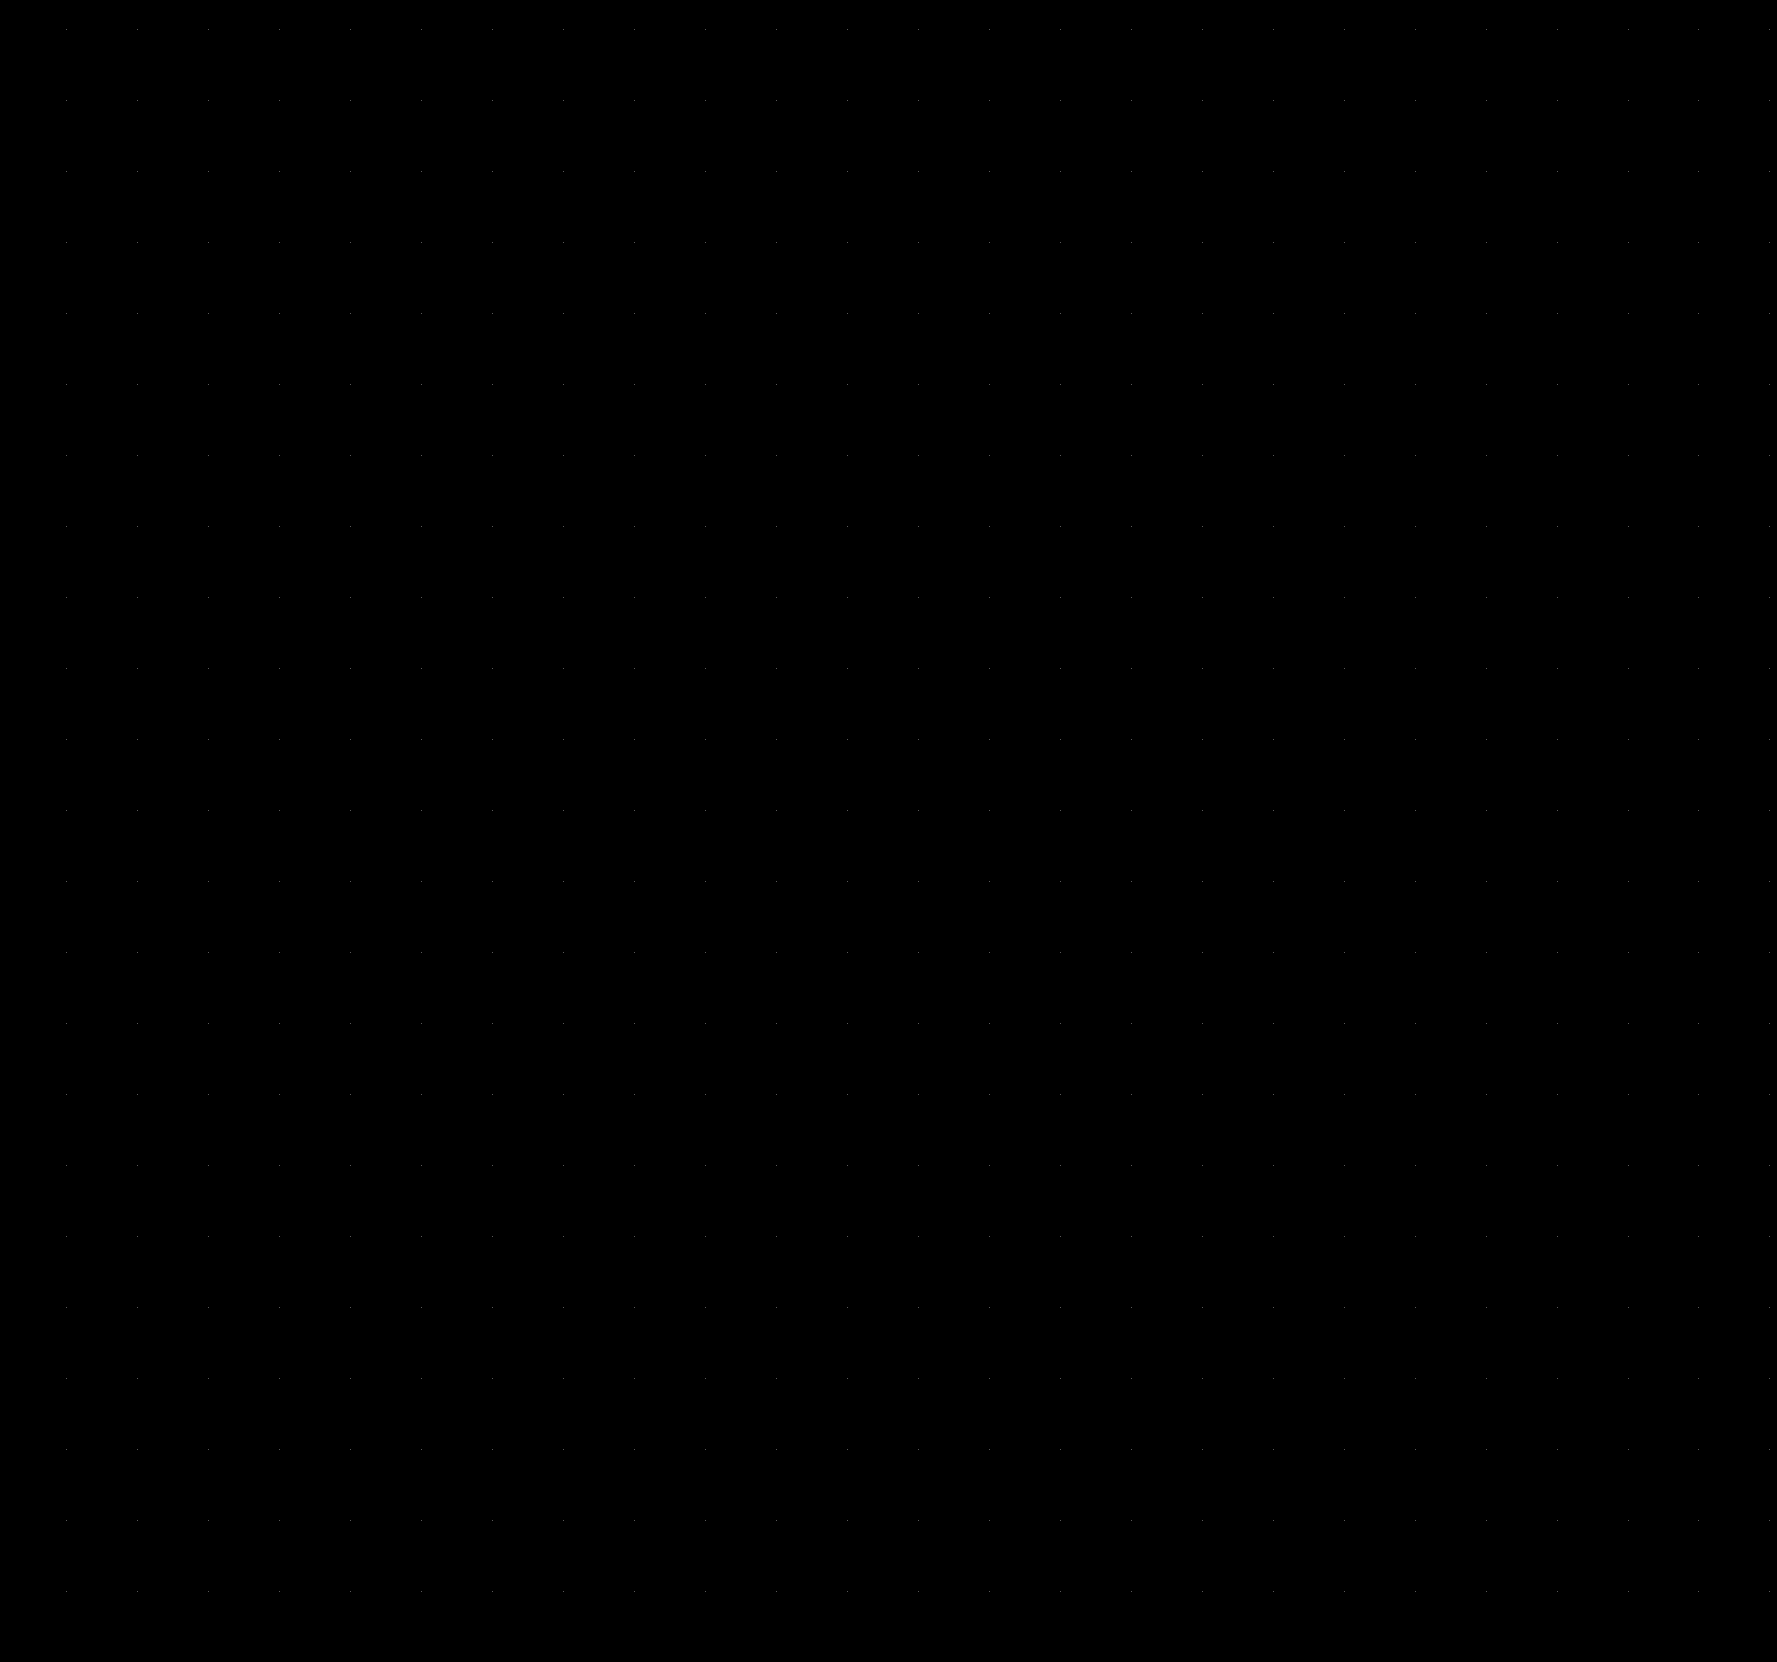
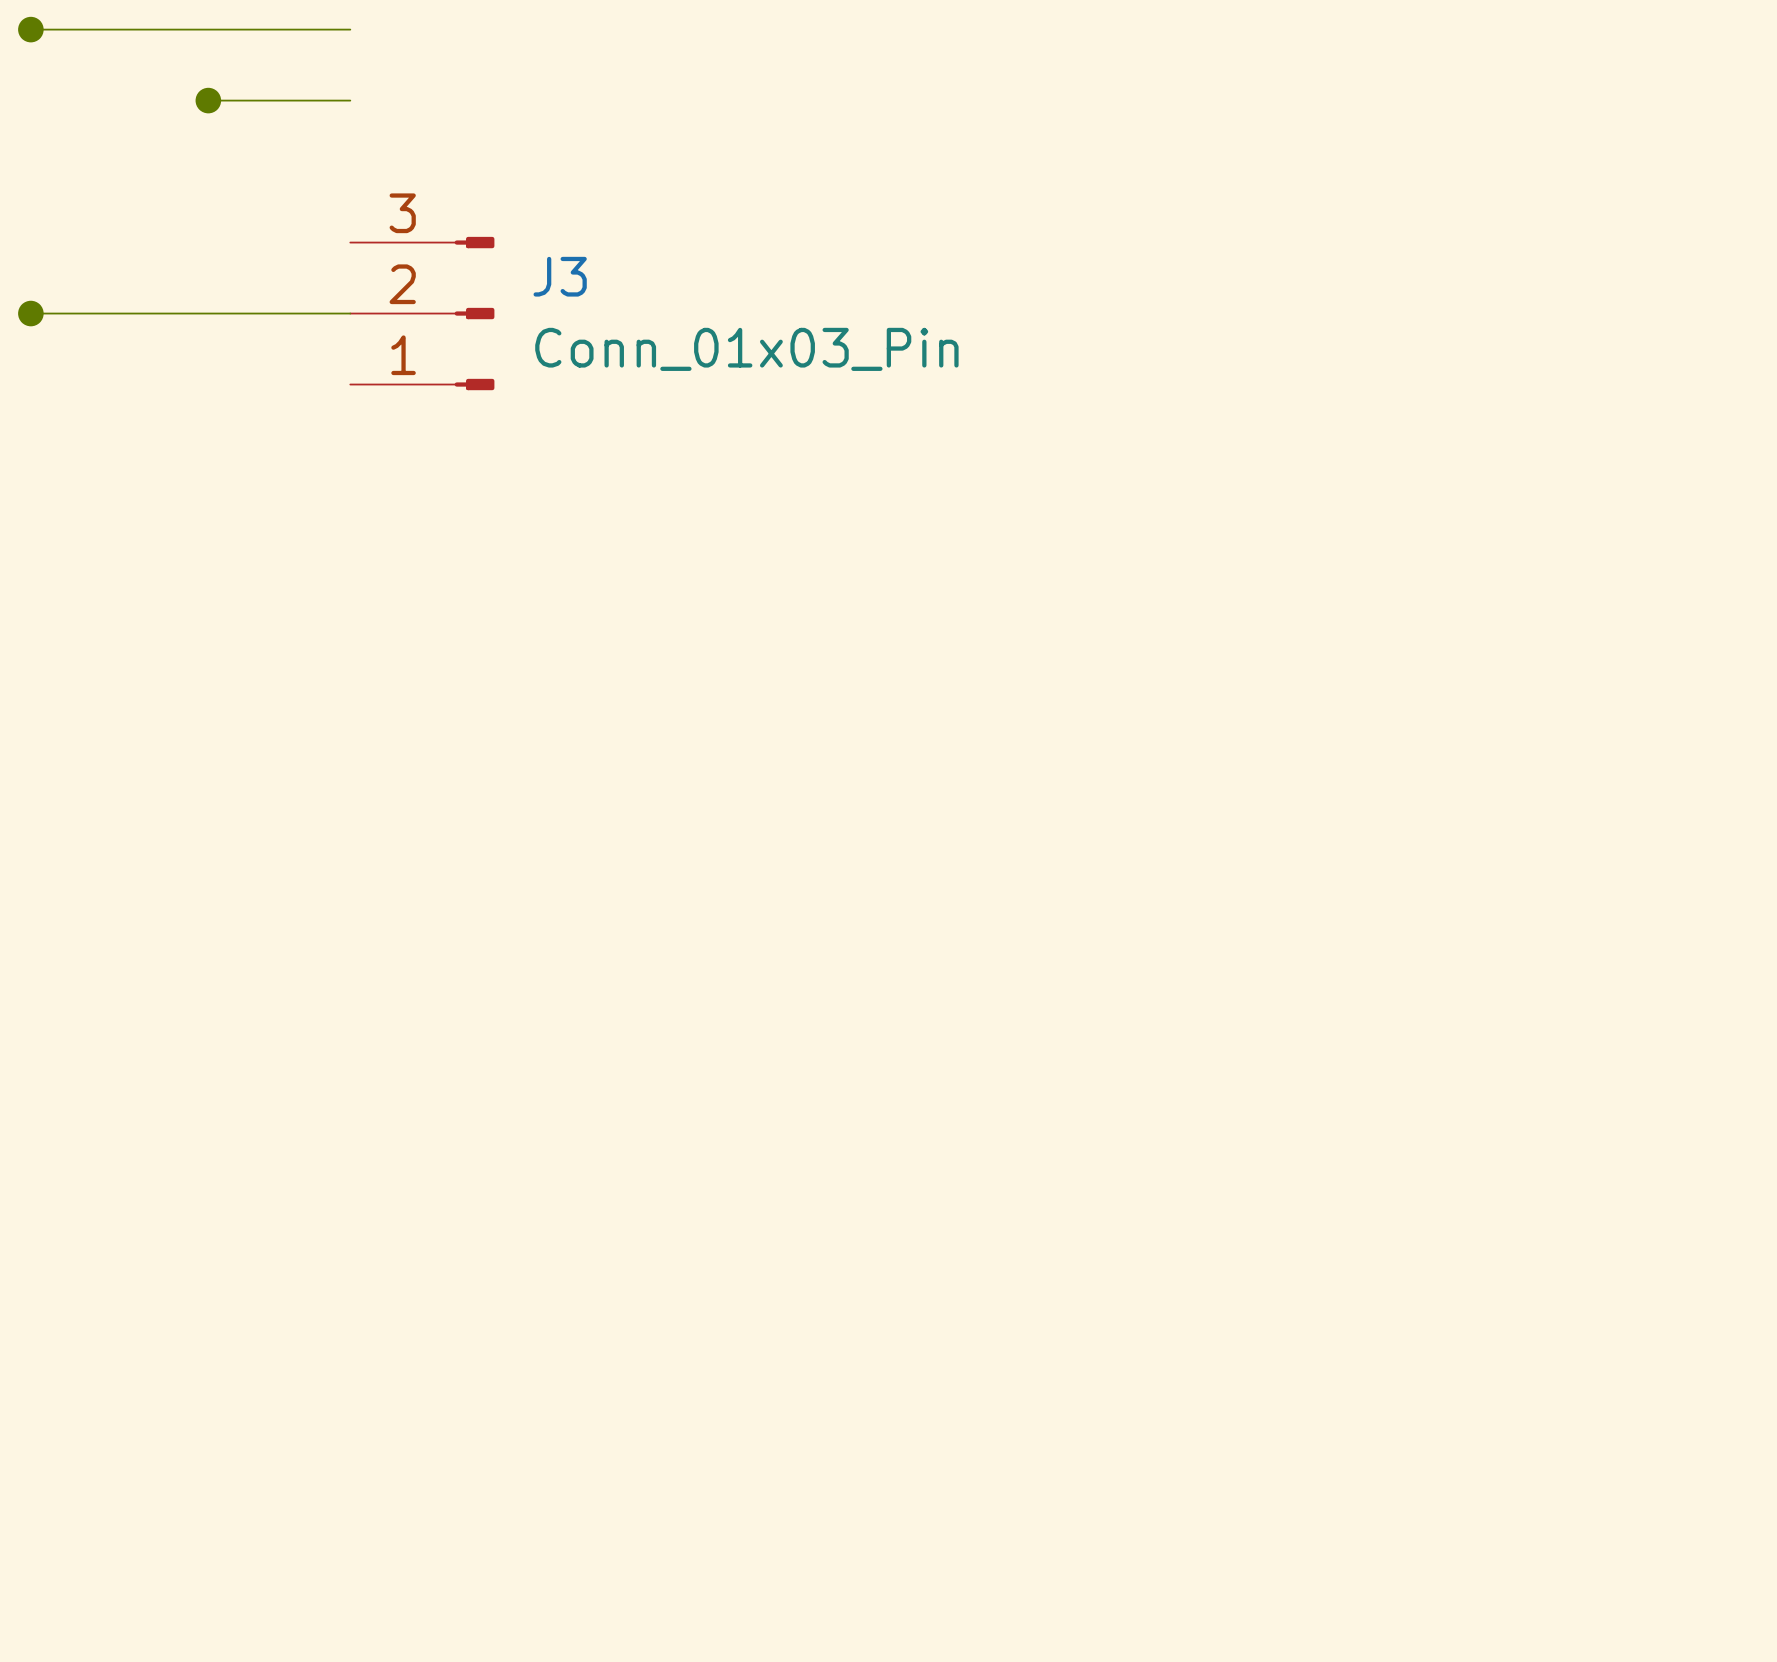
wire: none -> (30, 29) (350, 29)
junction: none -> (30, 29)
wire: none -> (208, 100) (350, 100)
junction: none -> (208, 100)
wire: none -> (30, 313) (350, 313)
junction: none -> (30, 313)
J3: none -> Conn_01x03_Pin (422, 313)

